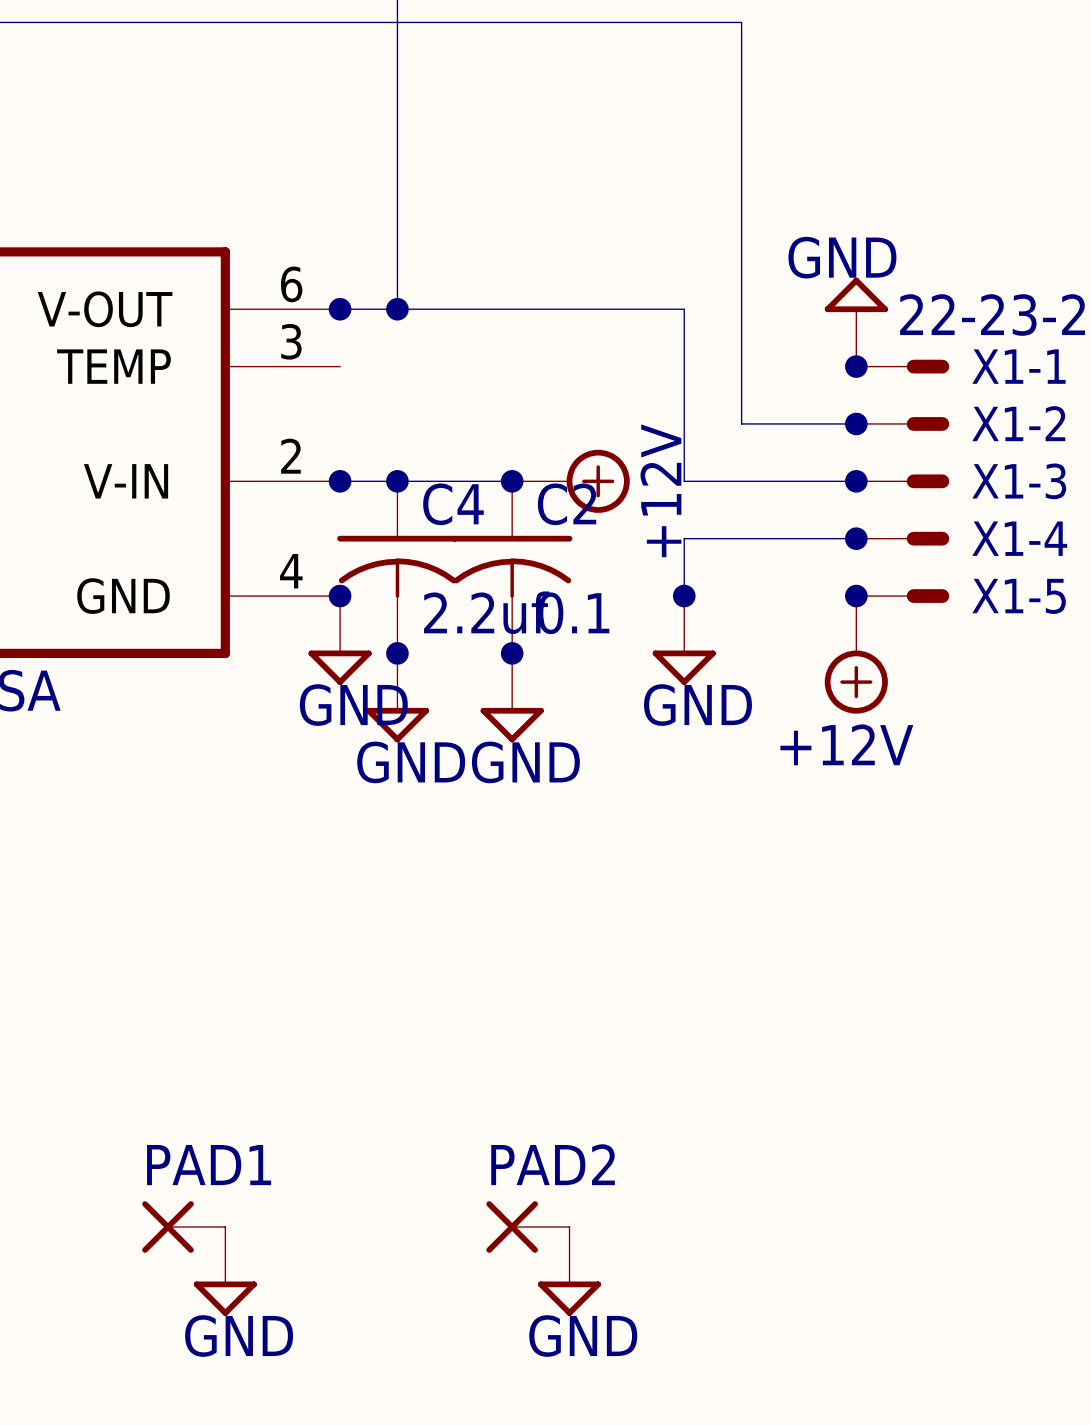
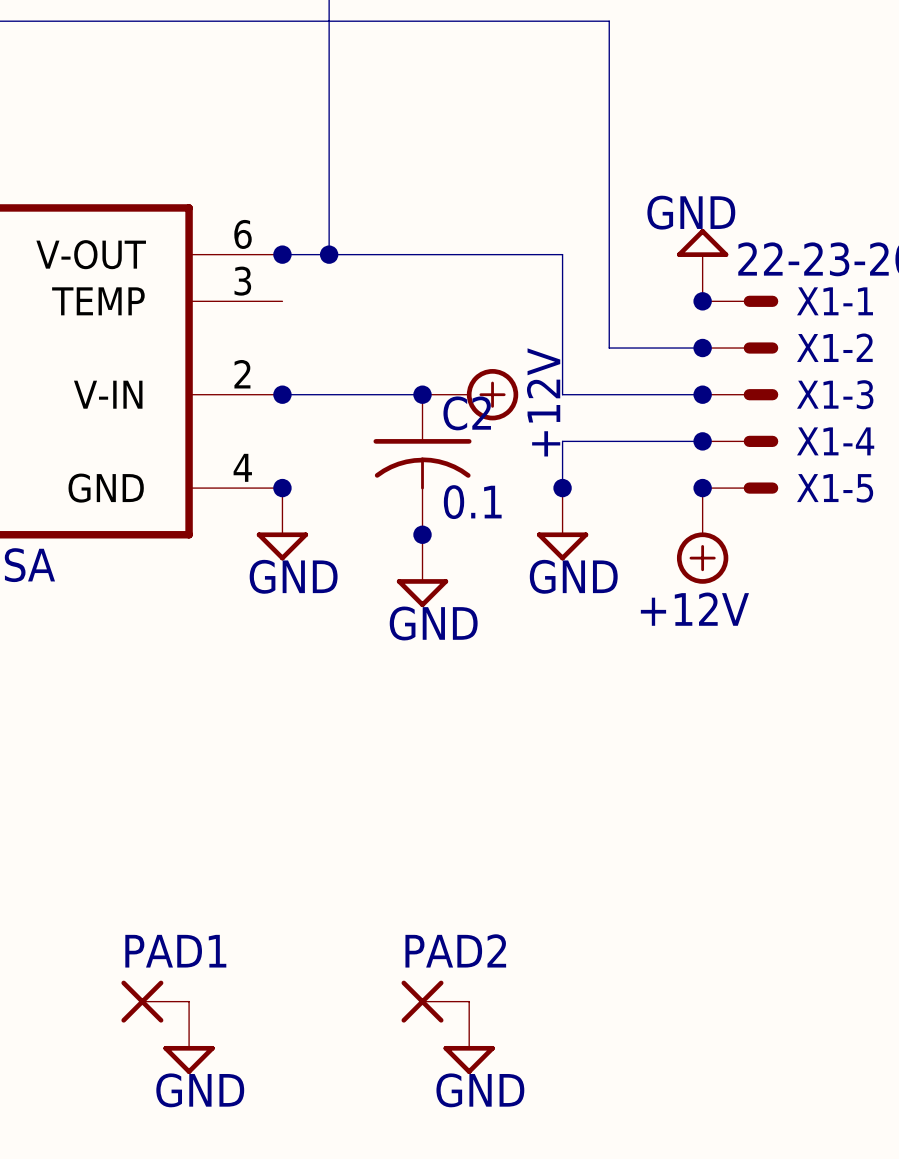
junction: (397, 481) -> none
C4: 2.2uf (397, 567) -> none
junction: (397, 653) -> none
power symbol: GND (397, 697) -> none

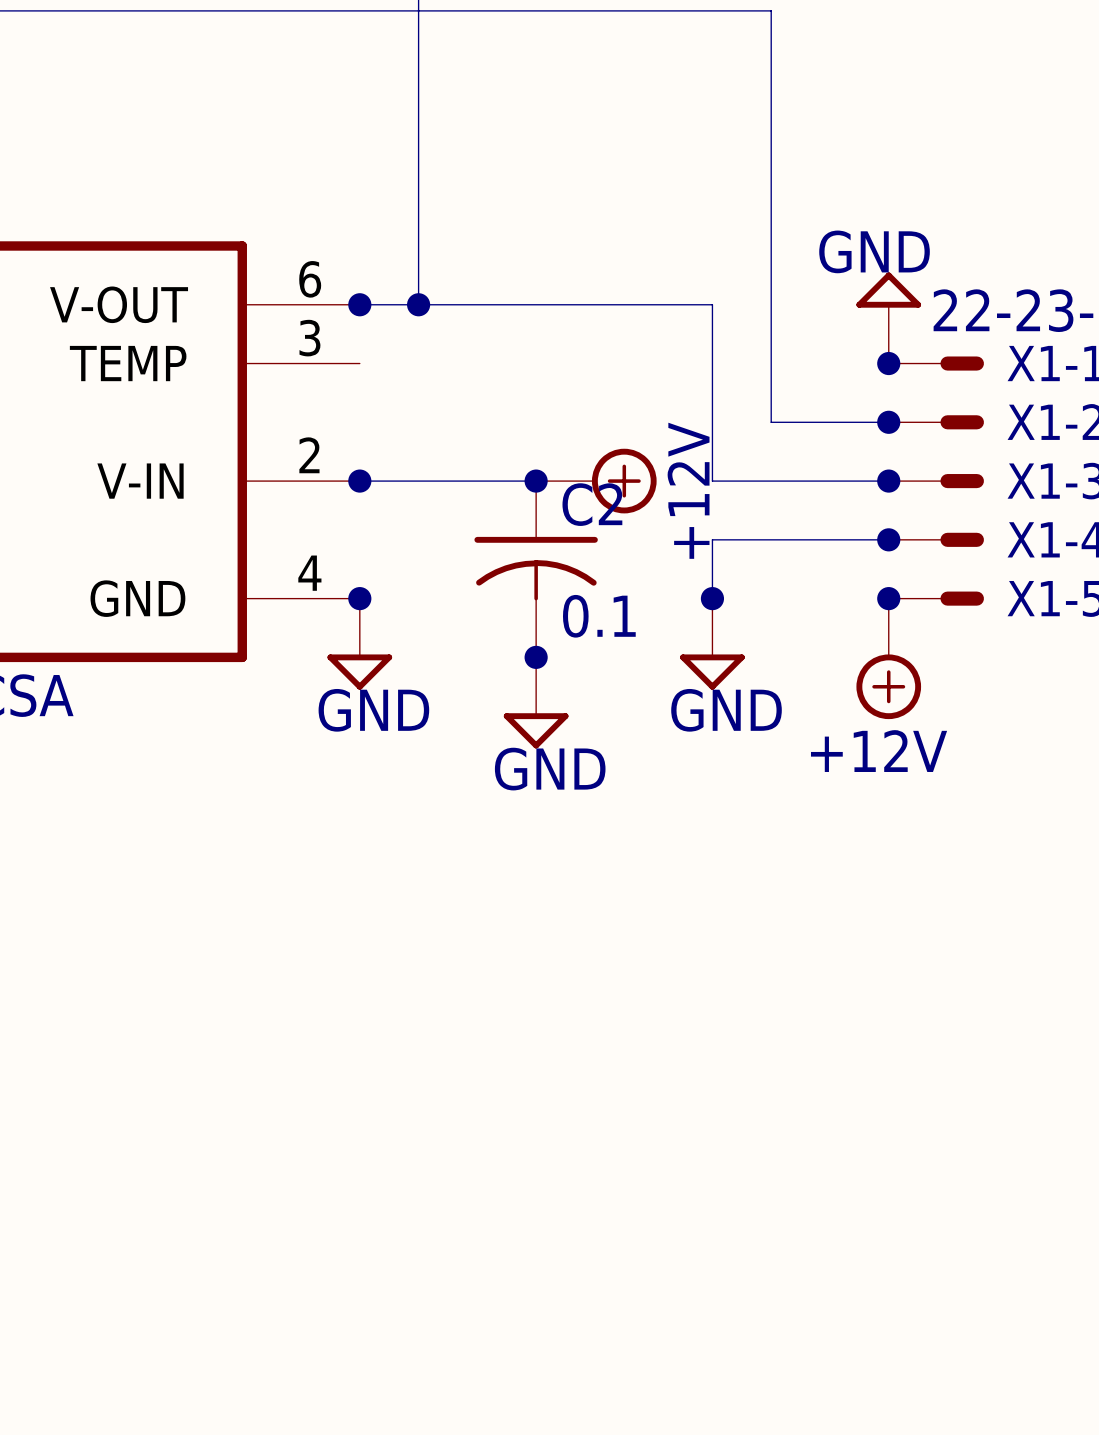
PAD1: (155, 1001) -> none
PAD2: (435, 1001) -> none
power symbol: GND (189, 1037) -> none
power symbol: GND (469, 1037) -> none

